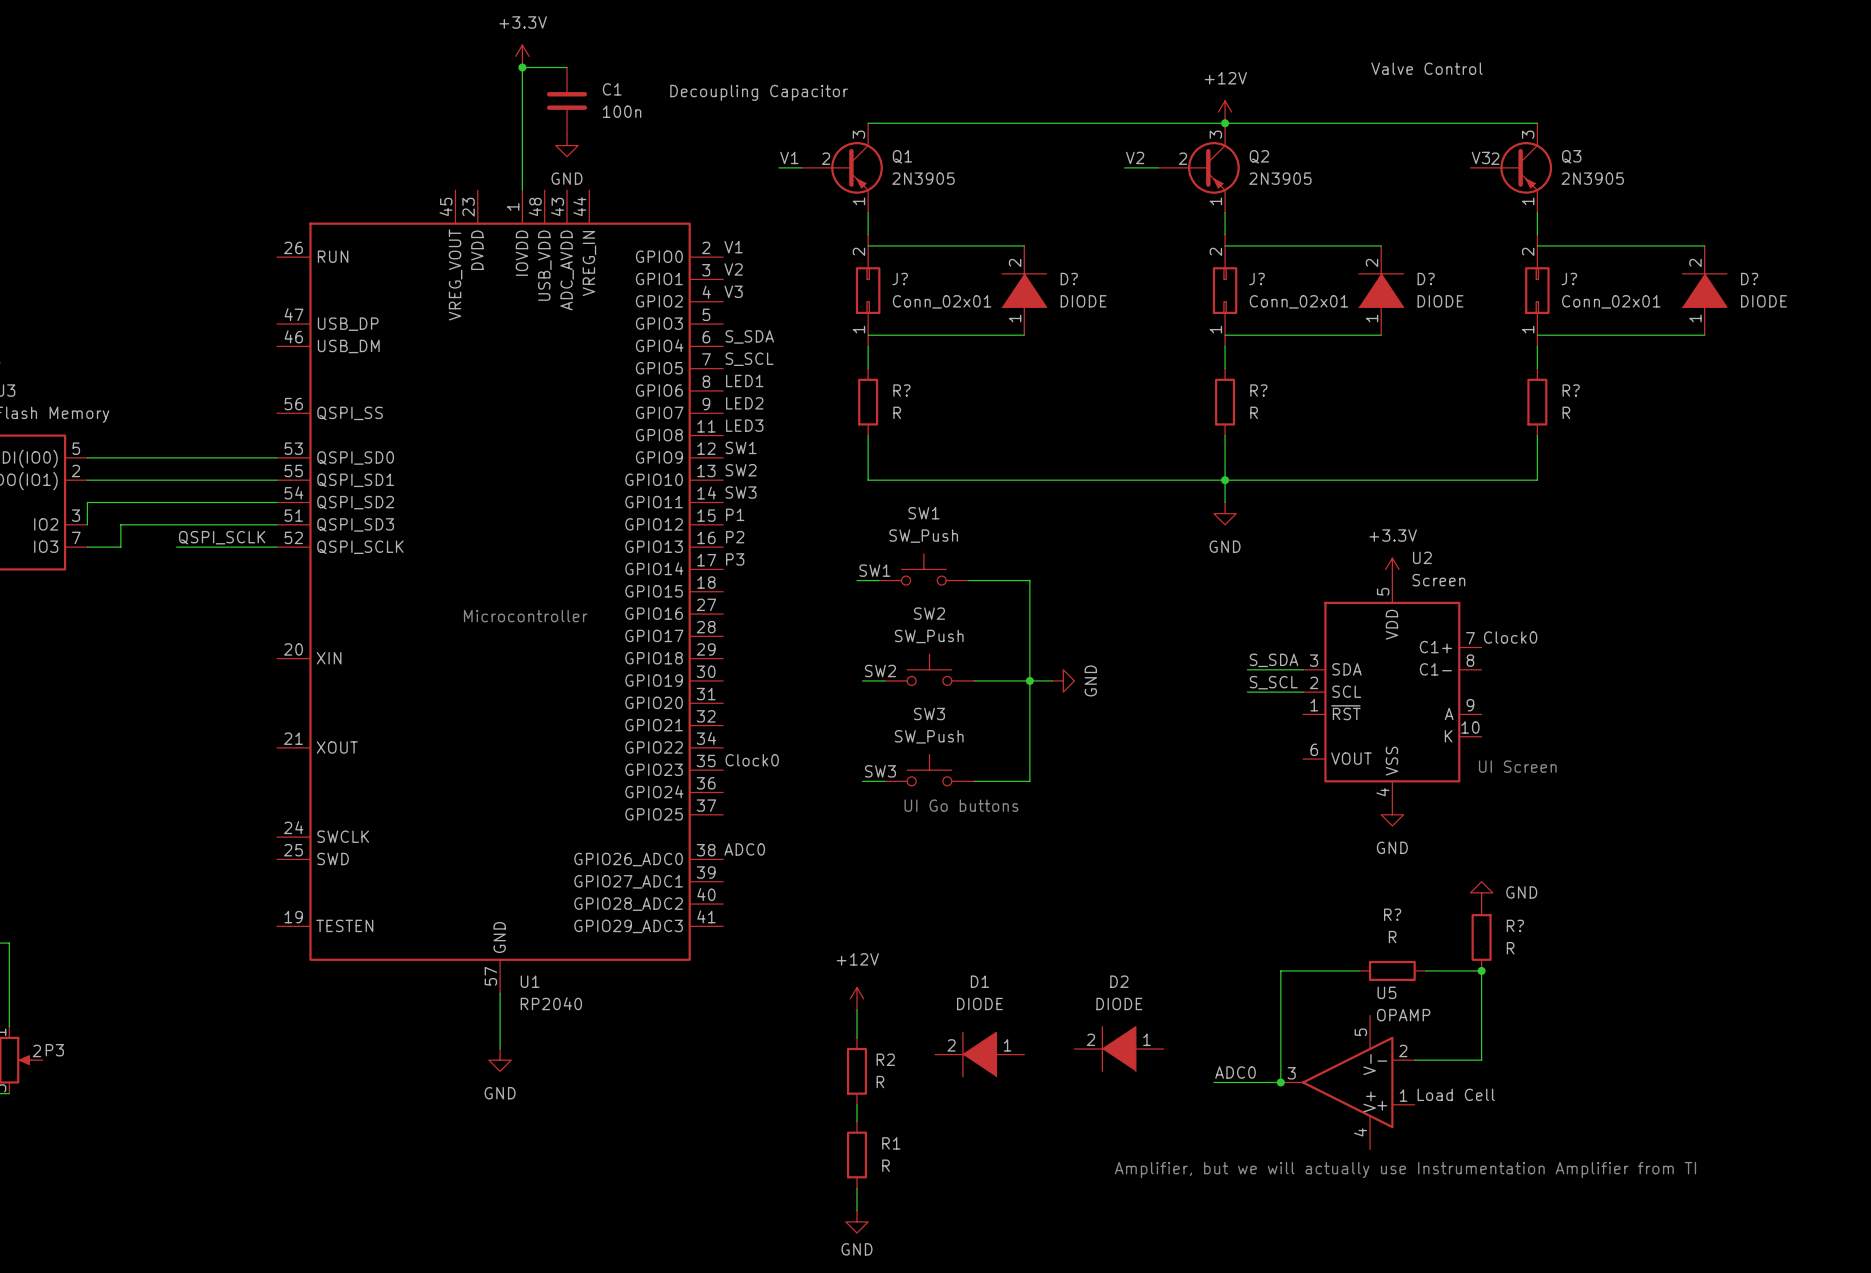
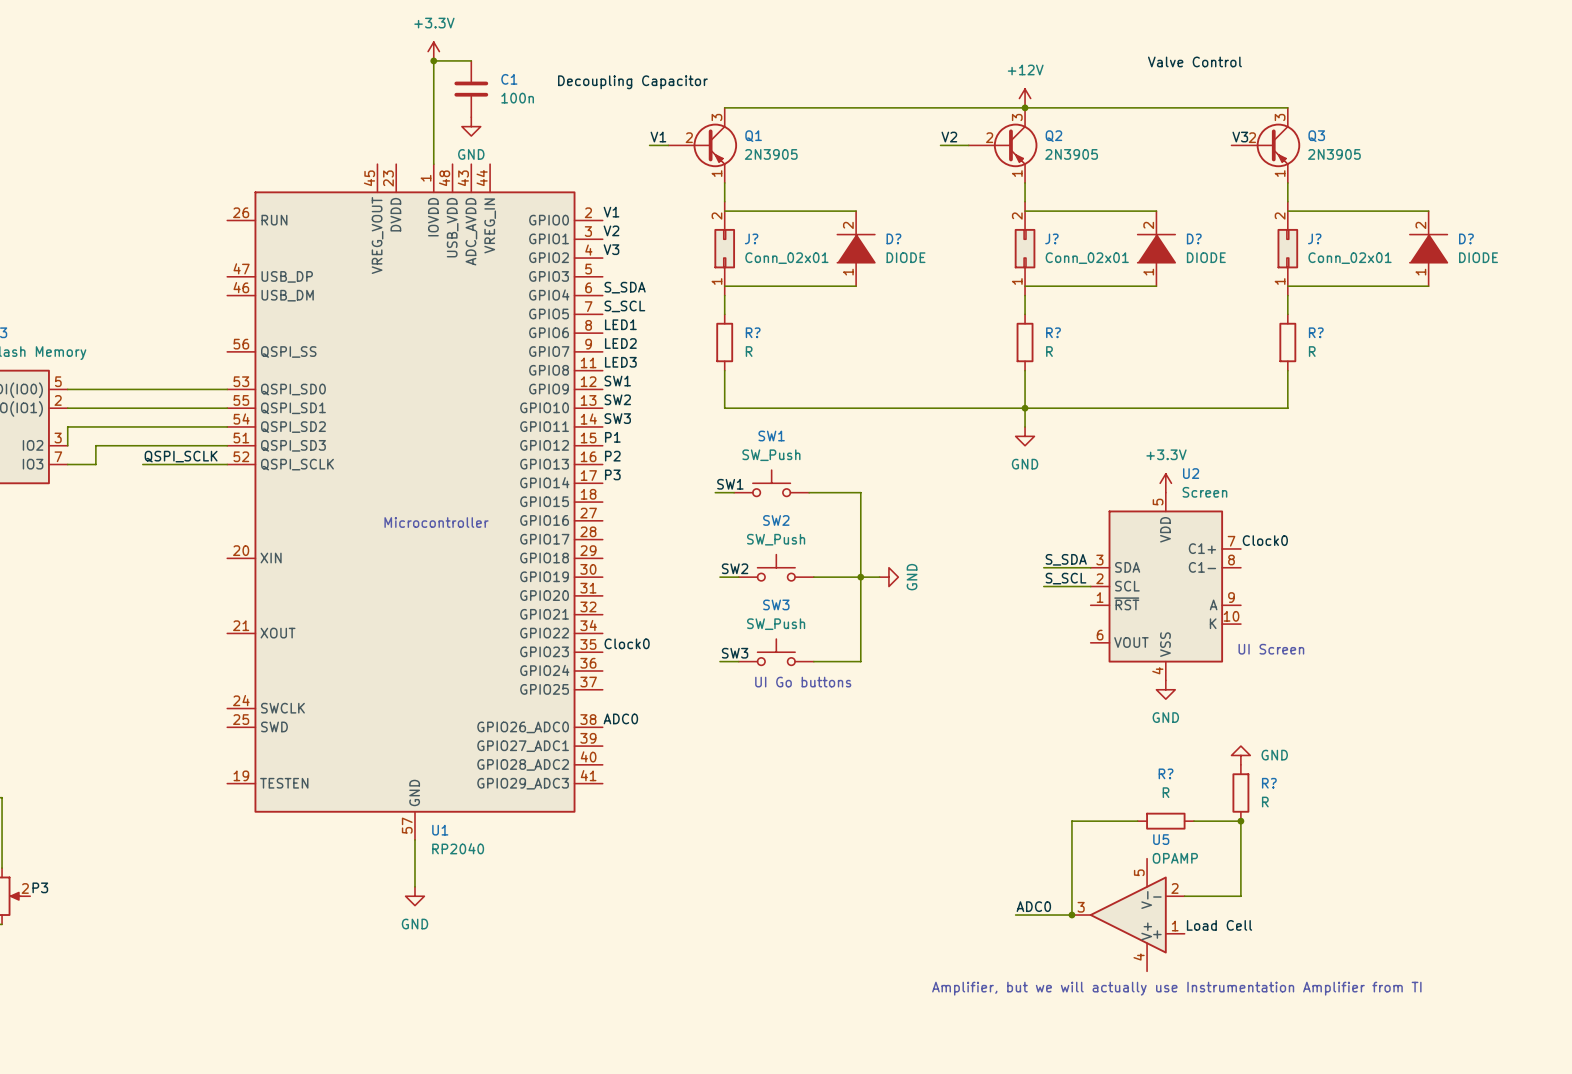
power symbol: +12V (856, 998) -> none
wire: (856, 1009) (856, 1037) -> none
D2: DIODE (1119, 1049) -> none
D1: DIODE (979, 1054) -> none
R2: R (856, 1071) -> none
wire: (856, 1104) (856, 1121) -> none
R1: R (856, 1154) -> none
wire: (856, 1188) (856, 1210) -> none
power symbol: GND (856, 1221) -> none

